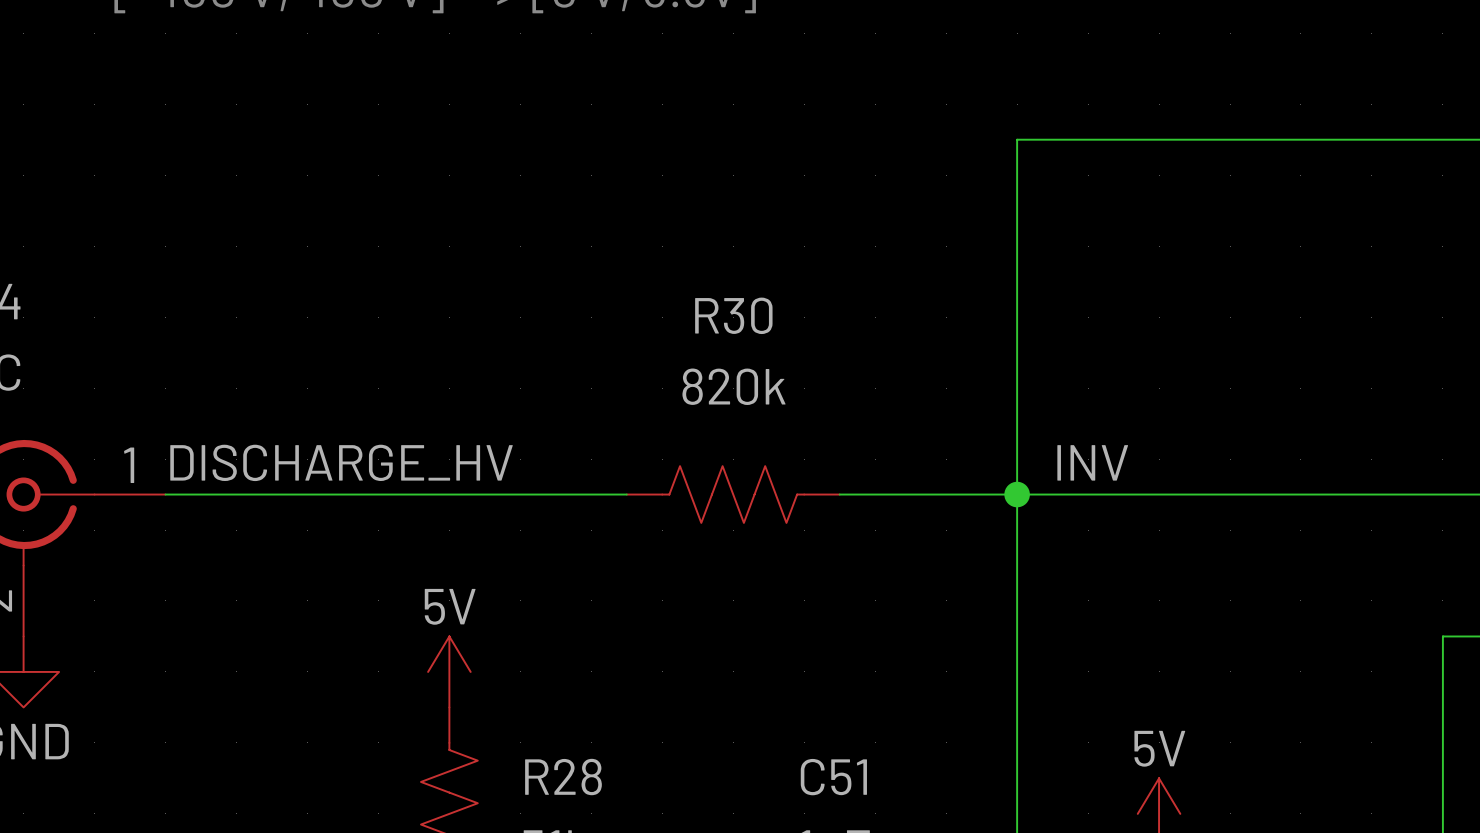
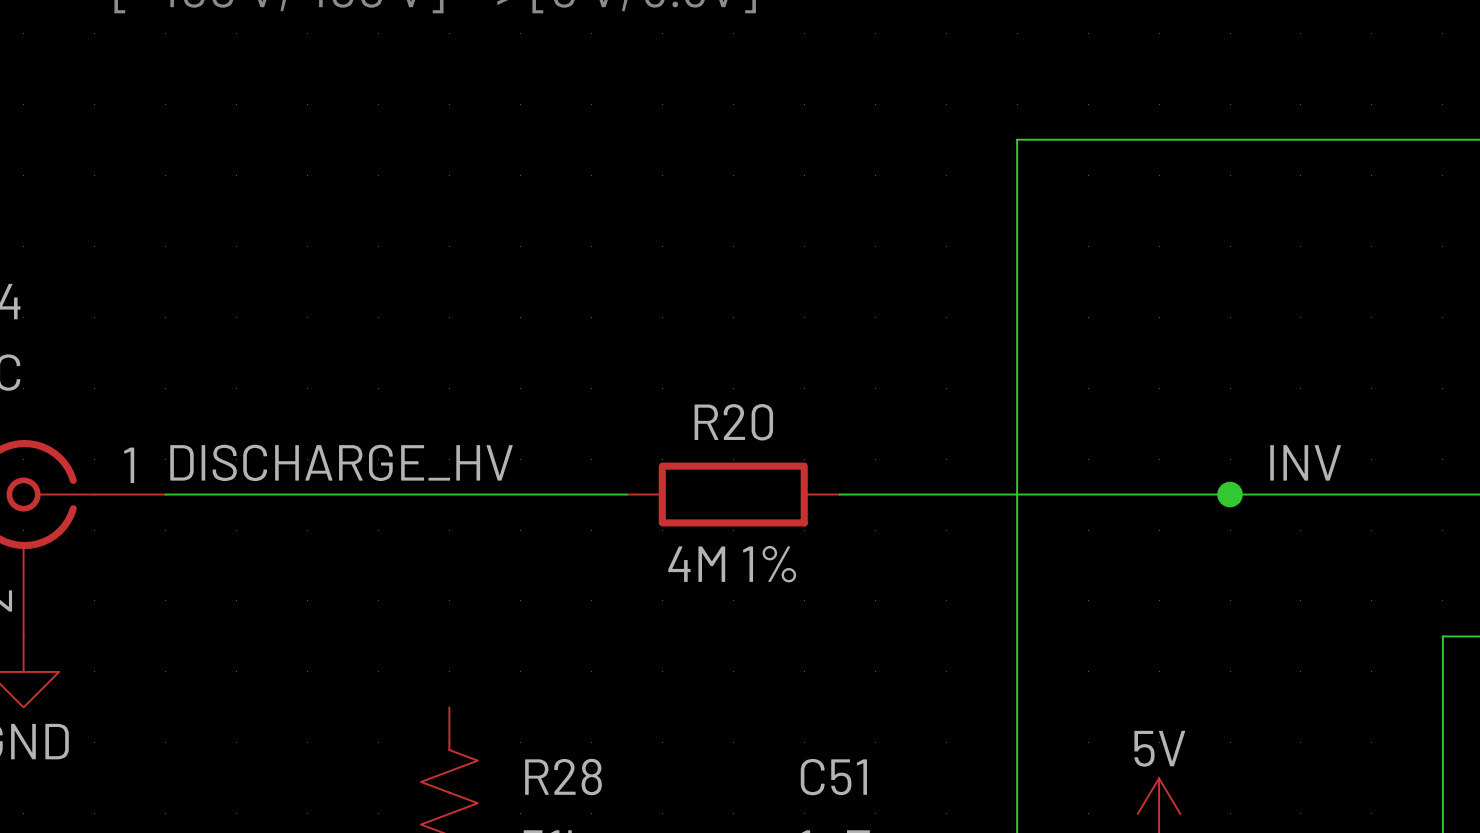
label position: INV (1092, 462) -> INV (1305, 462)
R30: 820k (733, 494) -> none
R20: none -> 4M 1% (733, 494)
junction: (1017, 494) -> none
junction: none -> (1230, 494)
power symbol: 5V (449, 671) -> none

